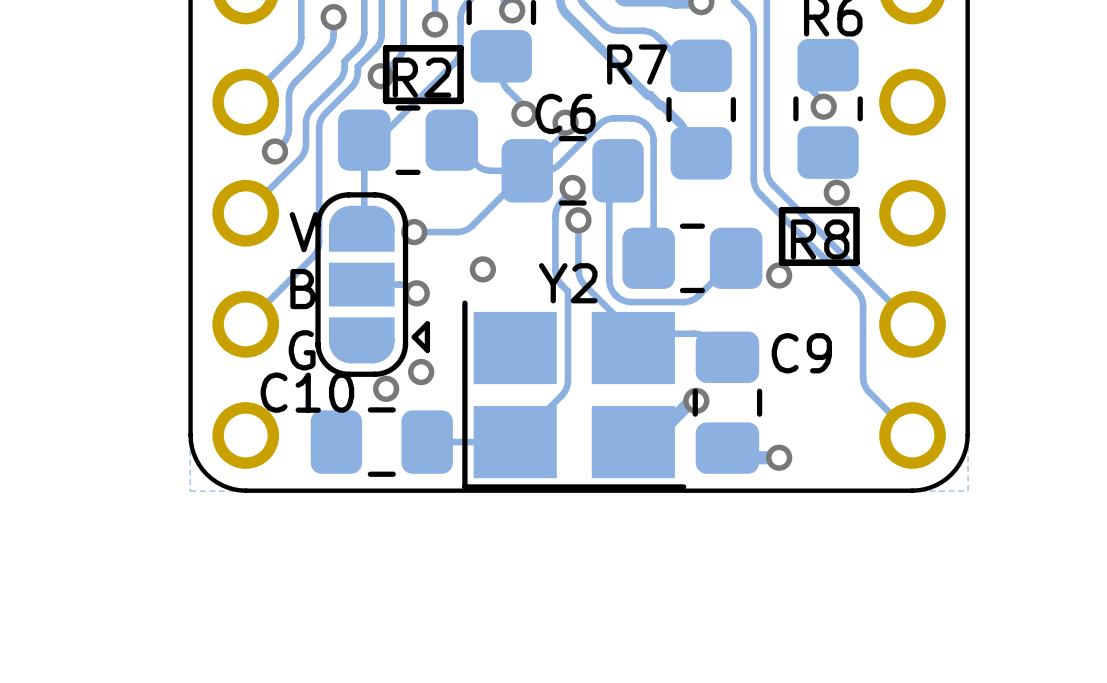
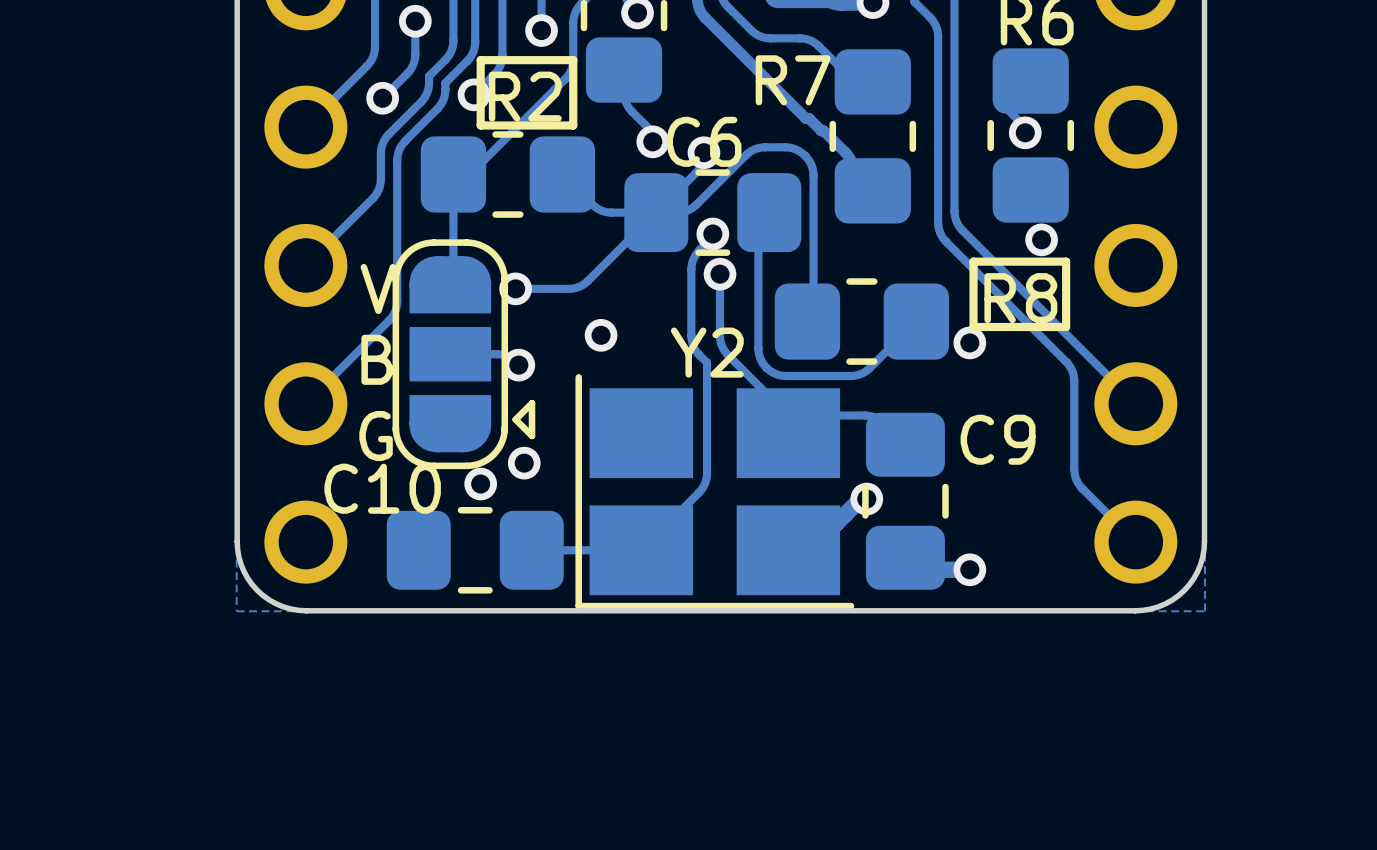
track: (333, 34) (329, 47) (291, 87) (289, 95) (288, 134) (284, 141) (275, 151) -> (415, 43) (415, 56) (412, 67) (382, 98)
via: none -> (382, 98)
via: (275, 151) -> none

